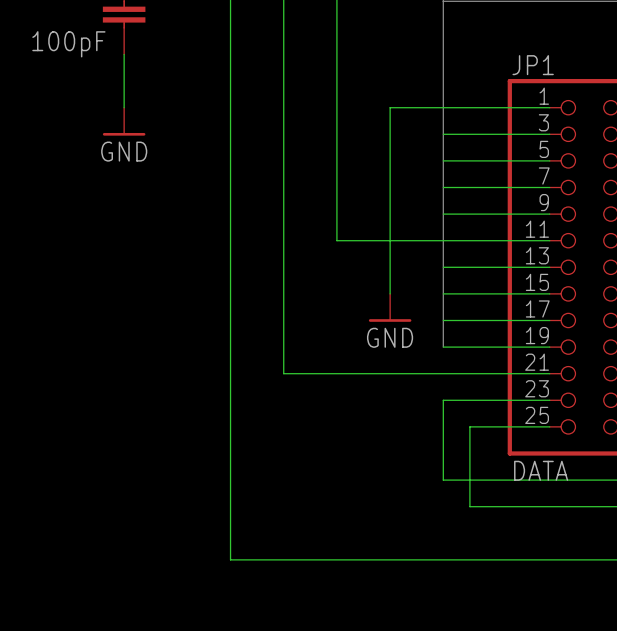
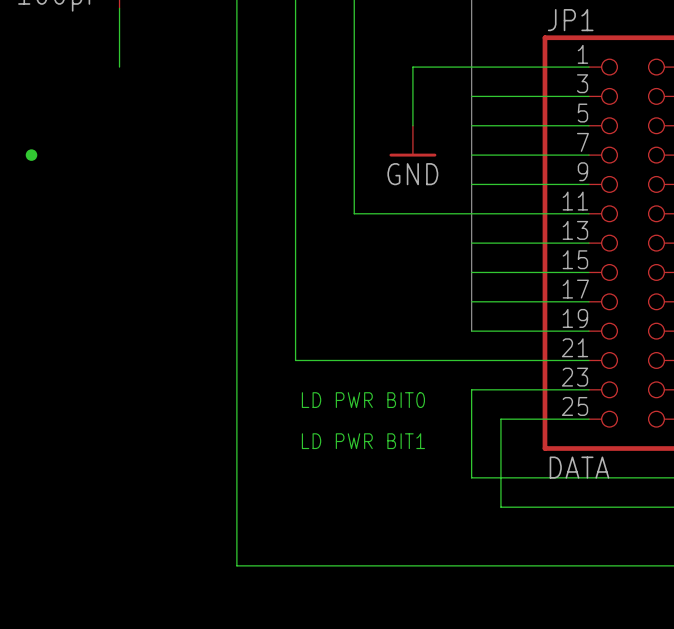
power symbol: GND (124, 121) -> none
wire: (390, 160) (390, 293) -> none
junction: none -> (31, 155)
power symbol position: GND (390, 307) -> GND (412, 141)
text: none -> LD PWR BIT0 (363, 400)
text: none -> LD PWR BIT1 (363, 441)

